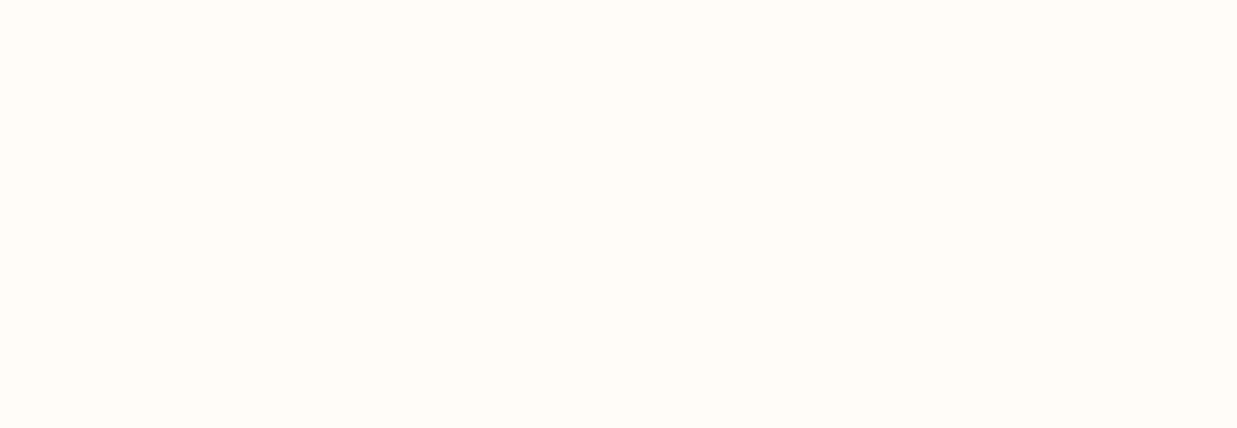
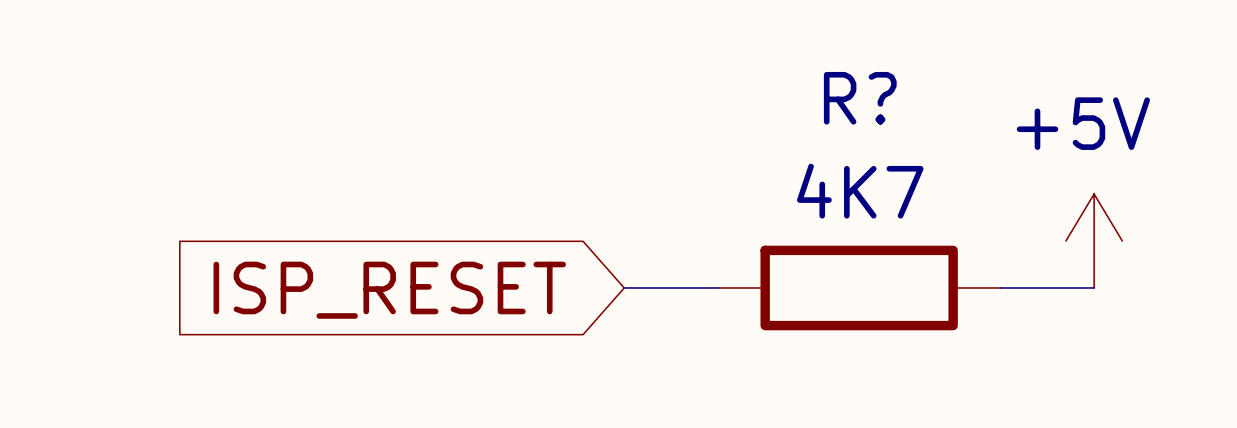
power symbol: none -> +5V (1094, 240)
wire: none -> (624, 287) (718, 287)
R?: none -> 4K7 (859, 287)
wire: none -> (1000, 287) (1094, 287)
global label: none -> ISP_RESET (389, 290)

